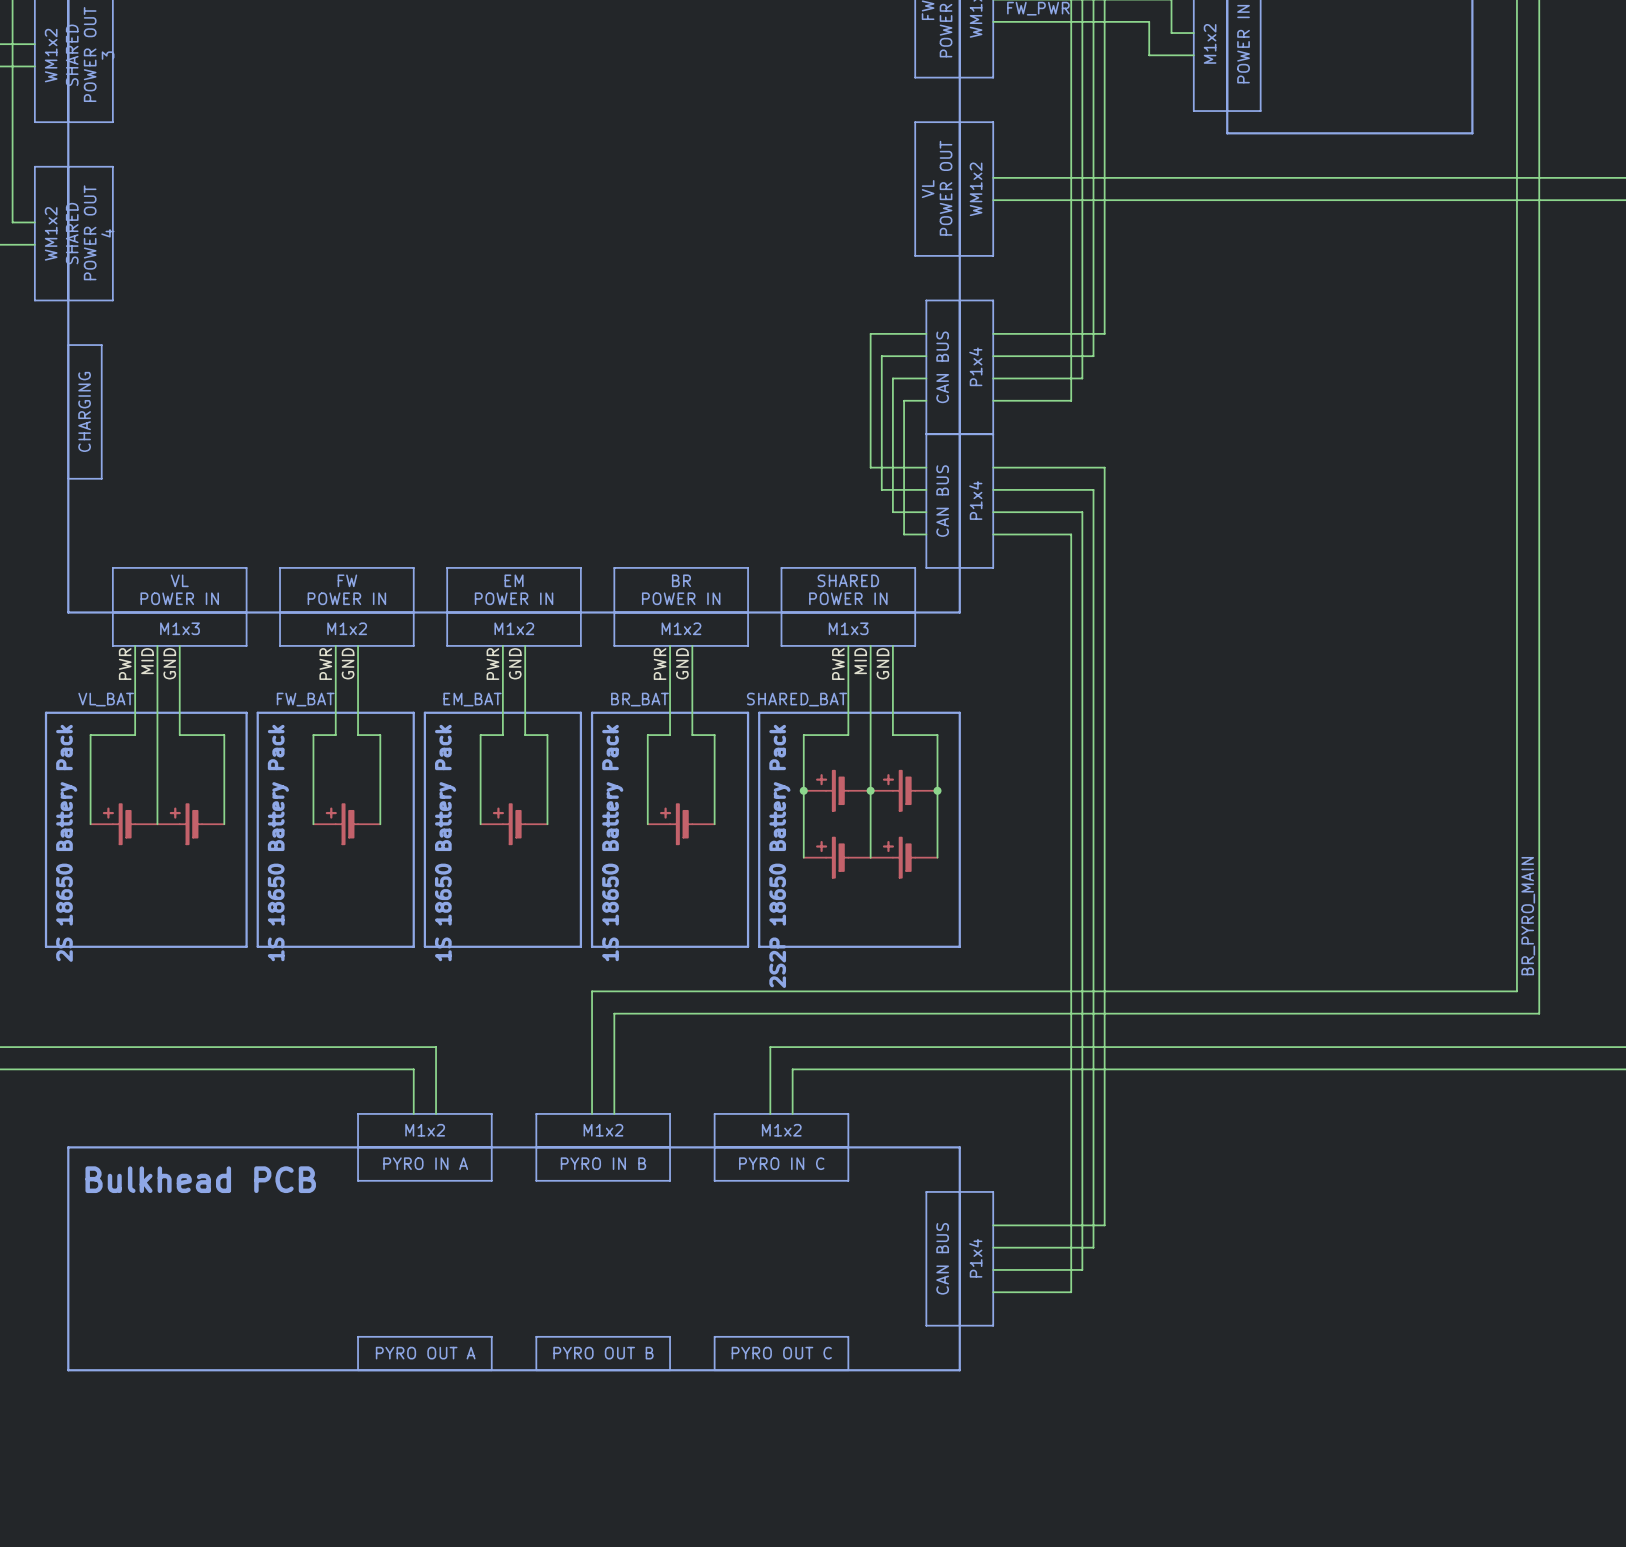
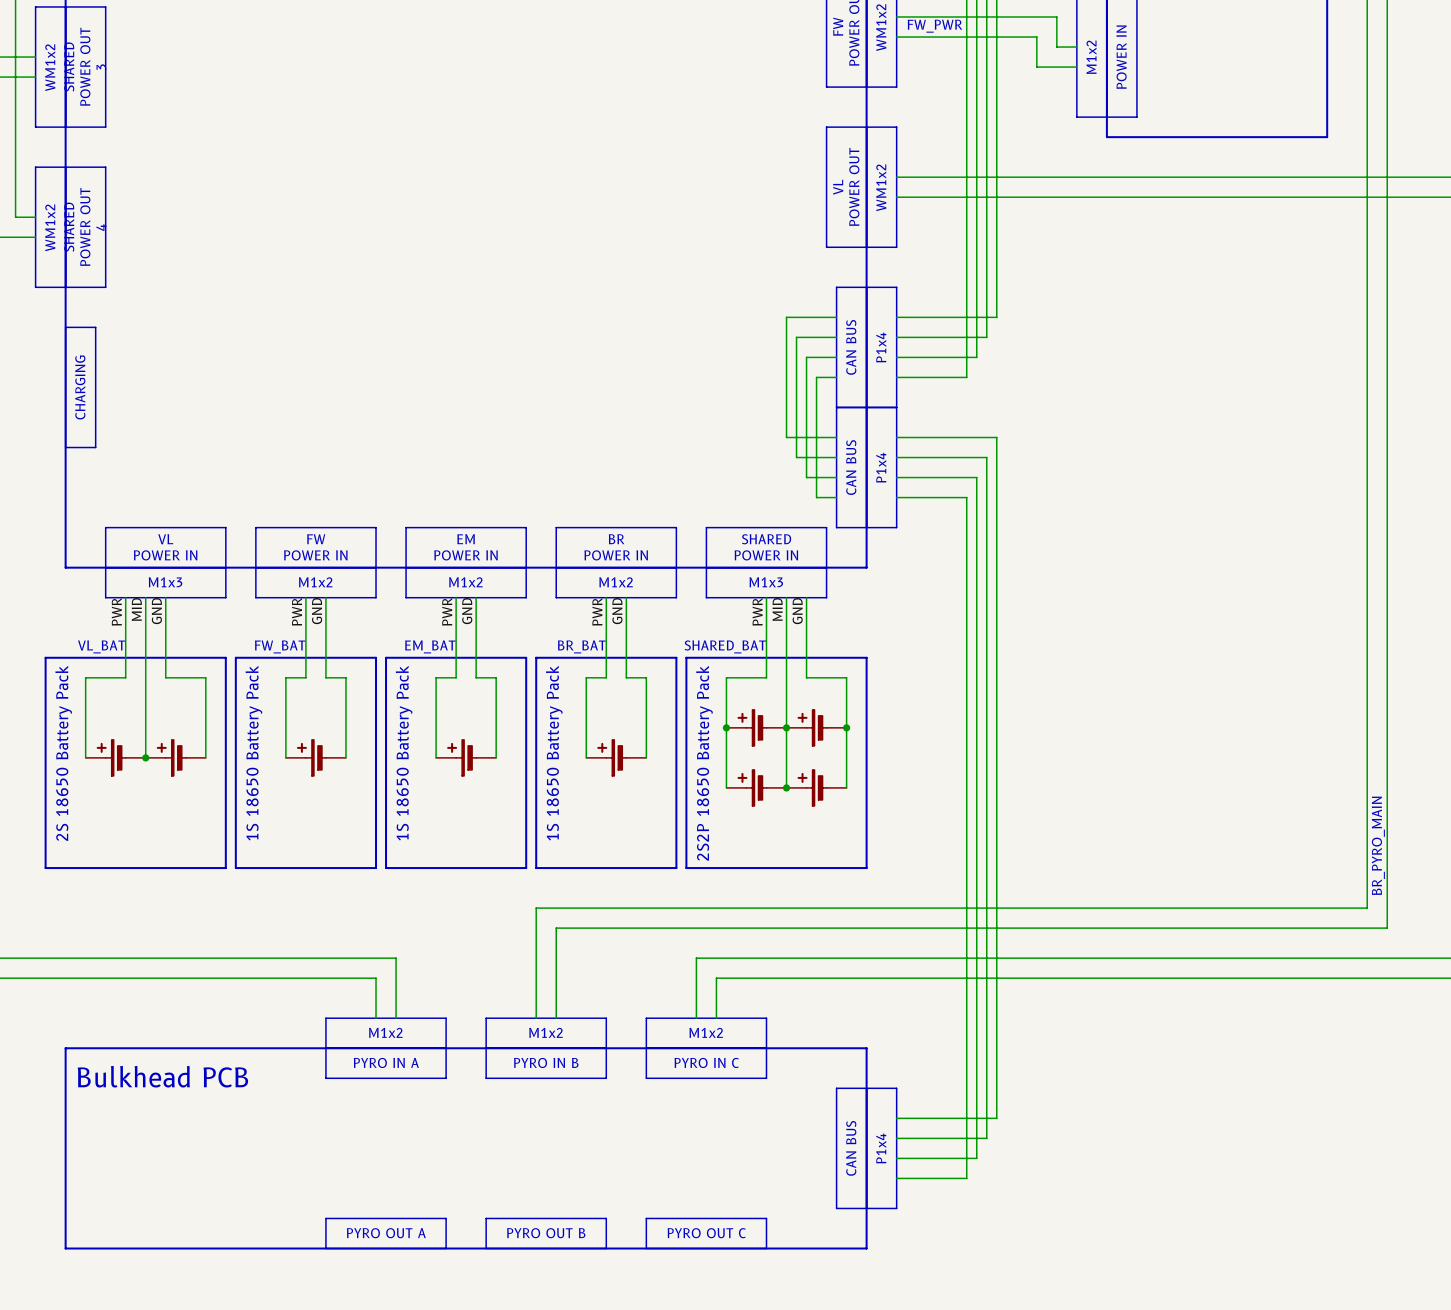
junction: none -> (145, 757)
junction: none -> (786, 787)

